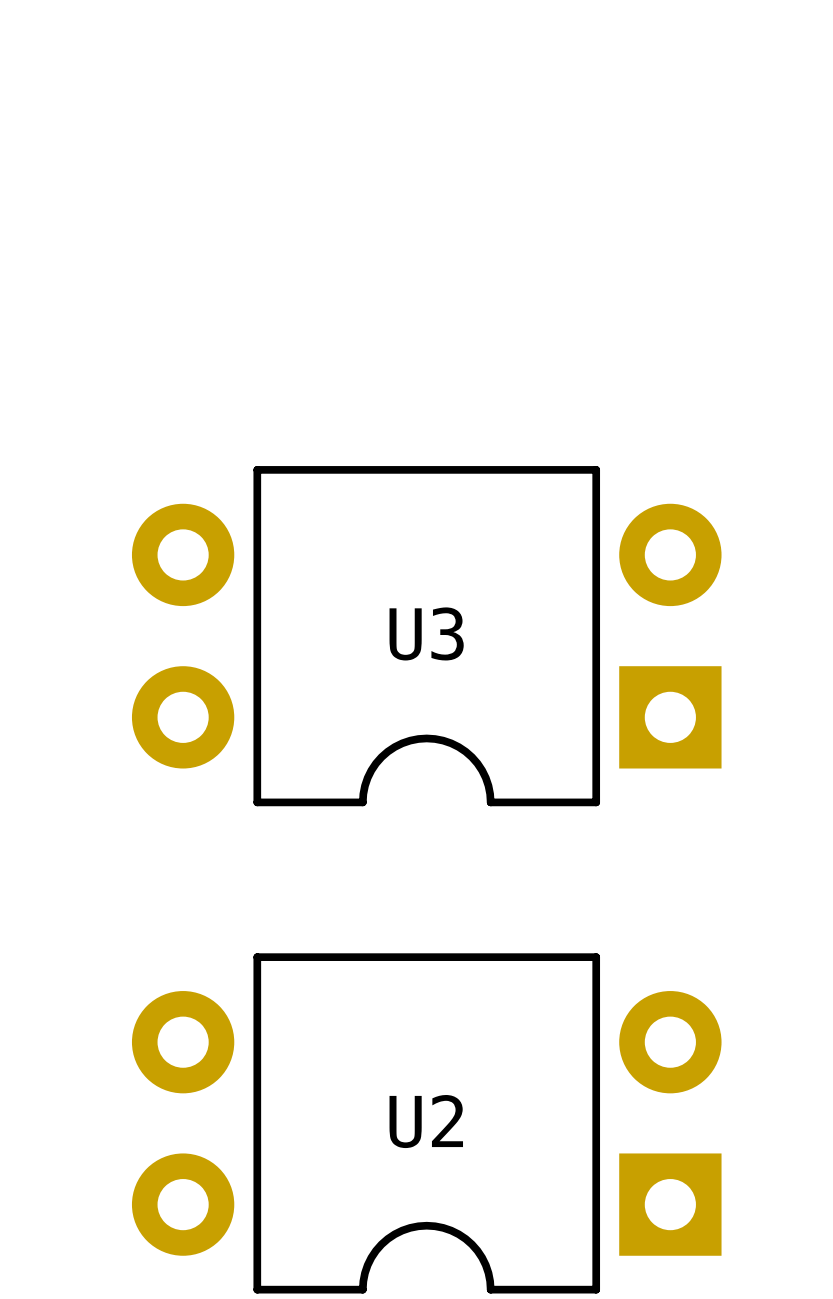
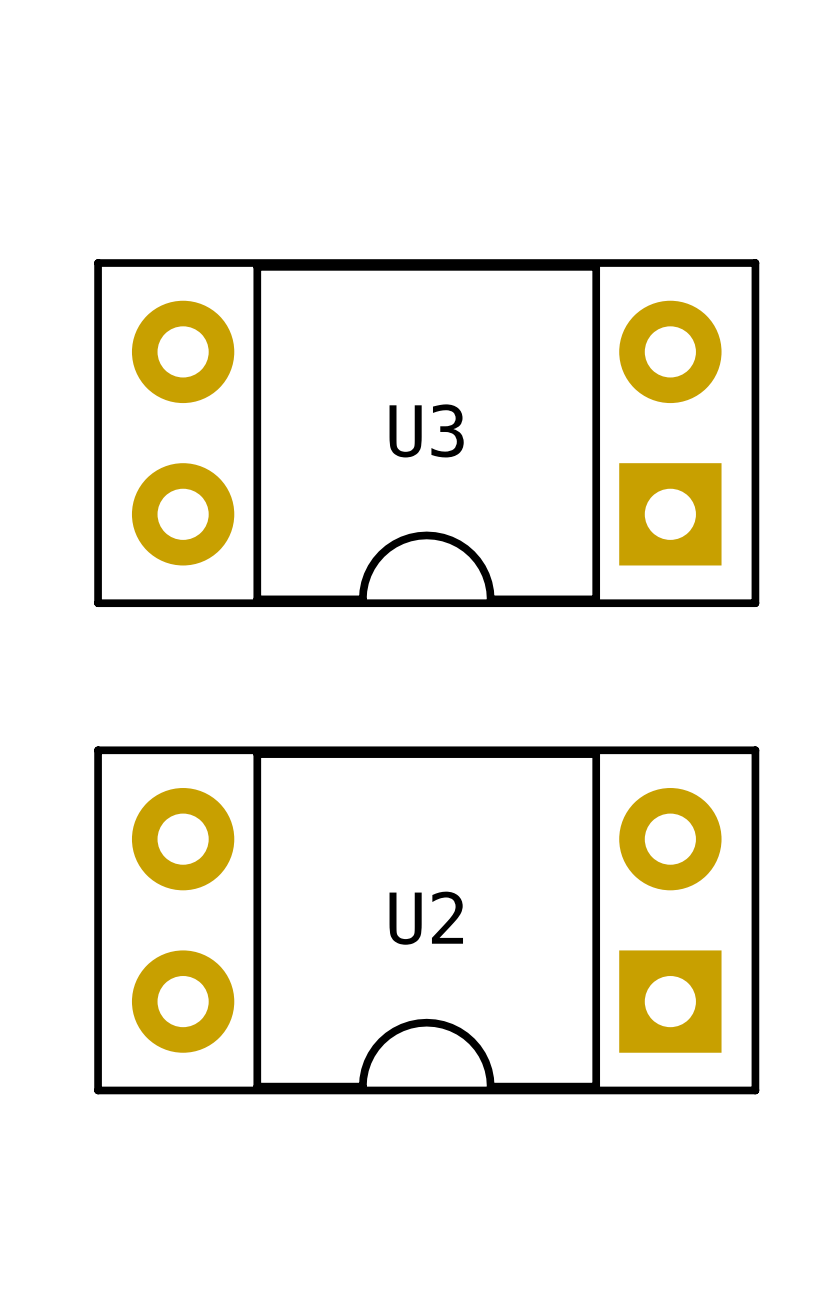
U3 footprint: [131, 466, 722, 807] -> [94, 259, 760, 608]
U2 footprint: [131, 953, 722, 1294] -> [94, 746, 760, 1095]

